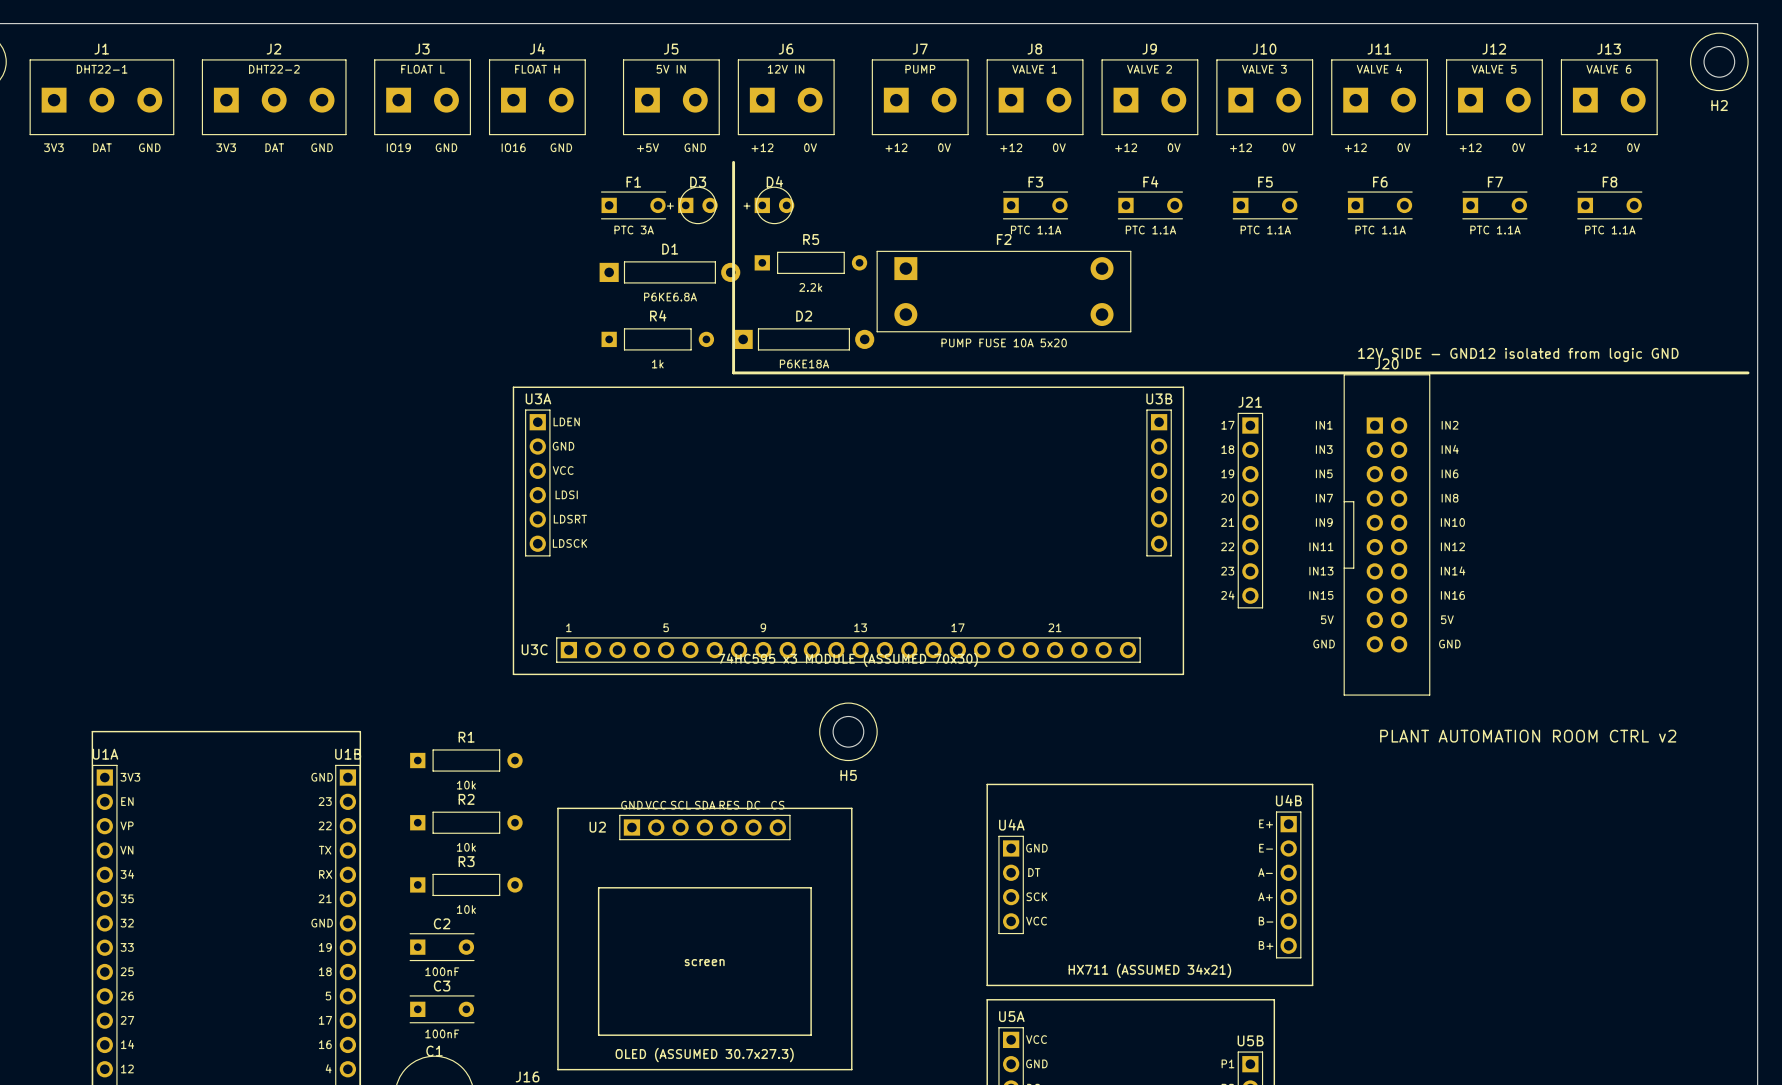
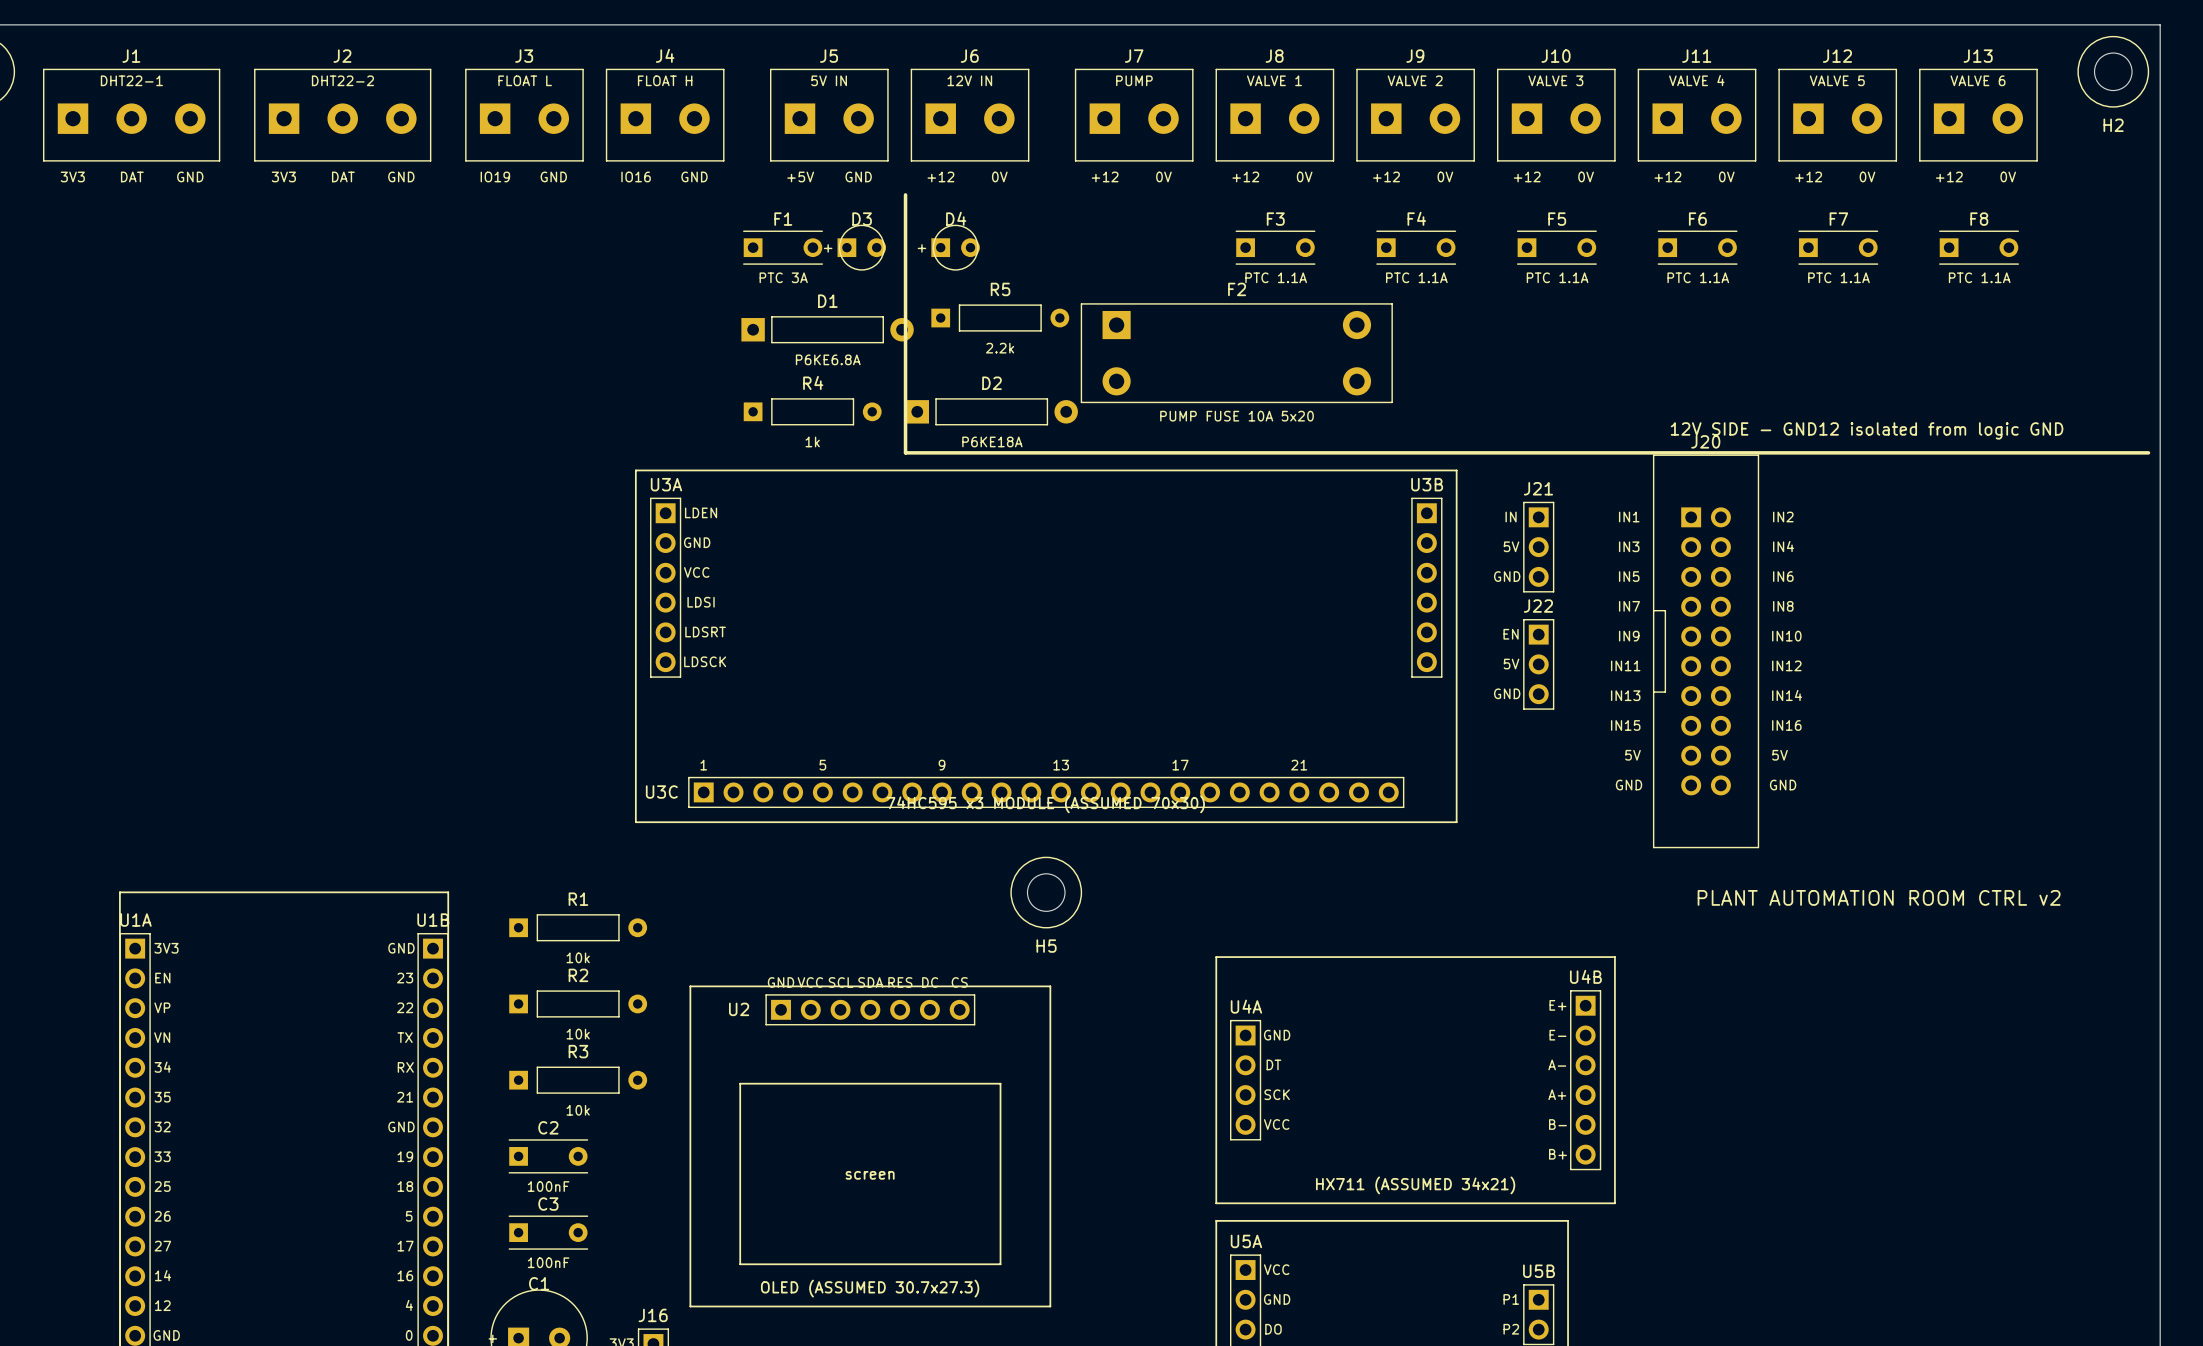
J21 footprint: [1237, 412, 1264, 609] -> [1523, 501, 1555, 593]
J22: none -> (1538, 664)

